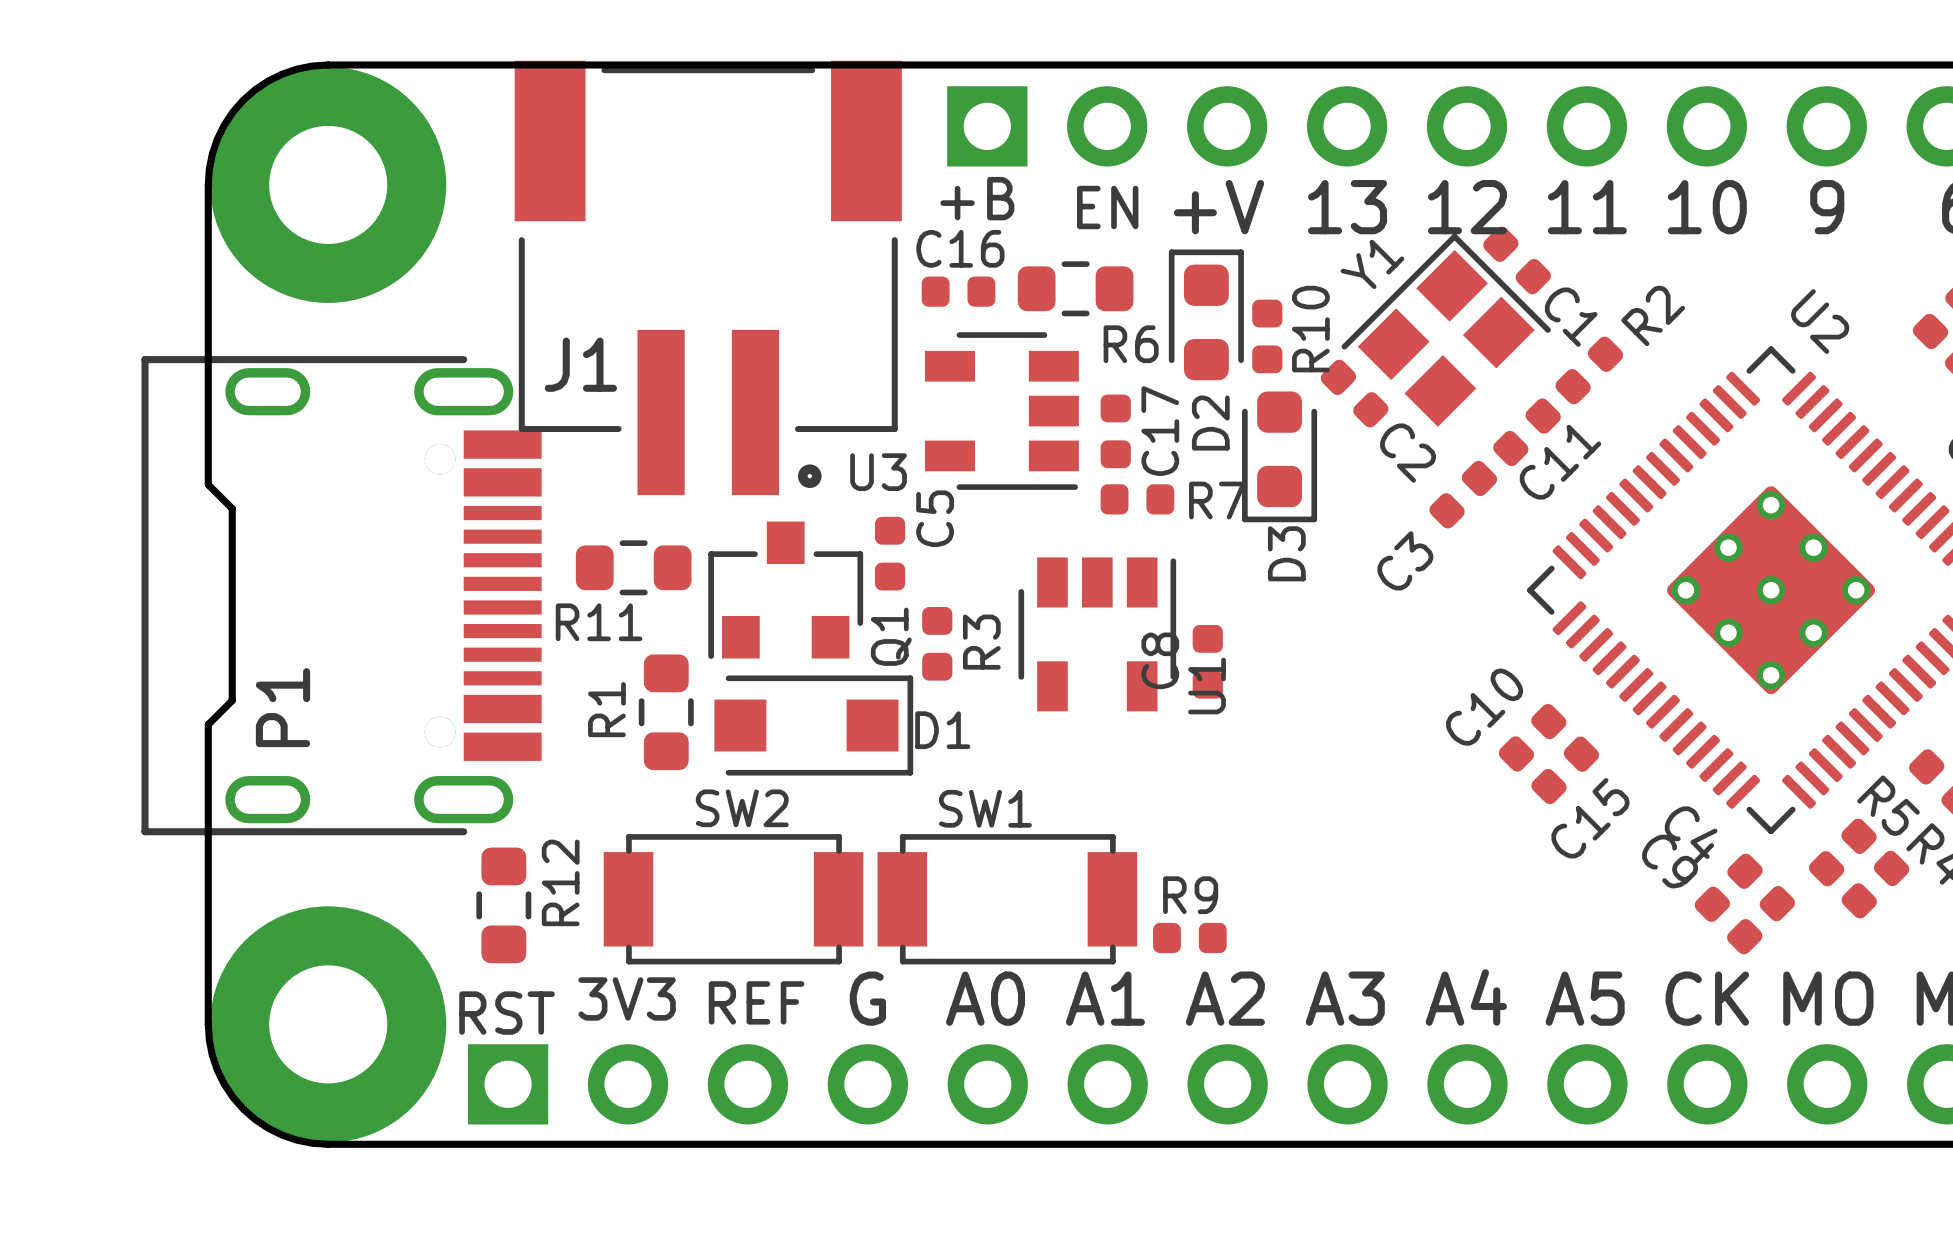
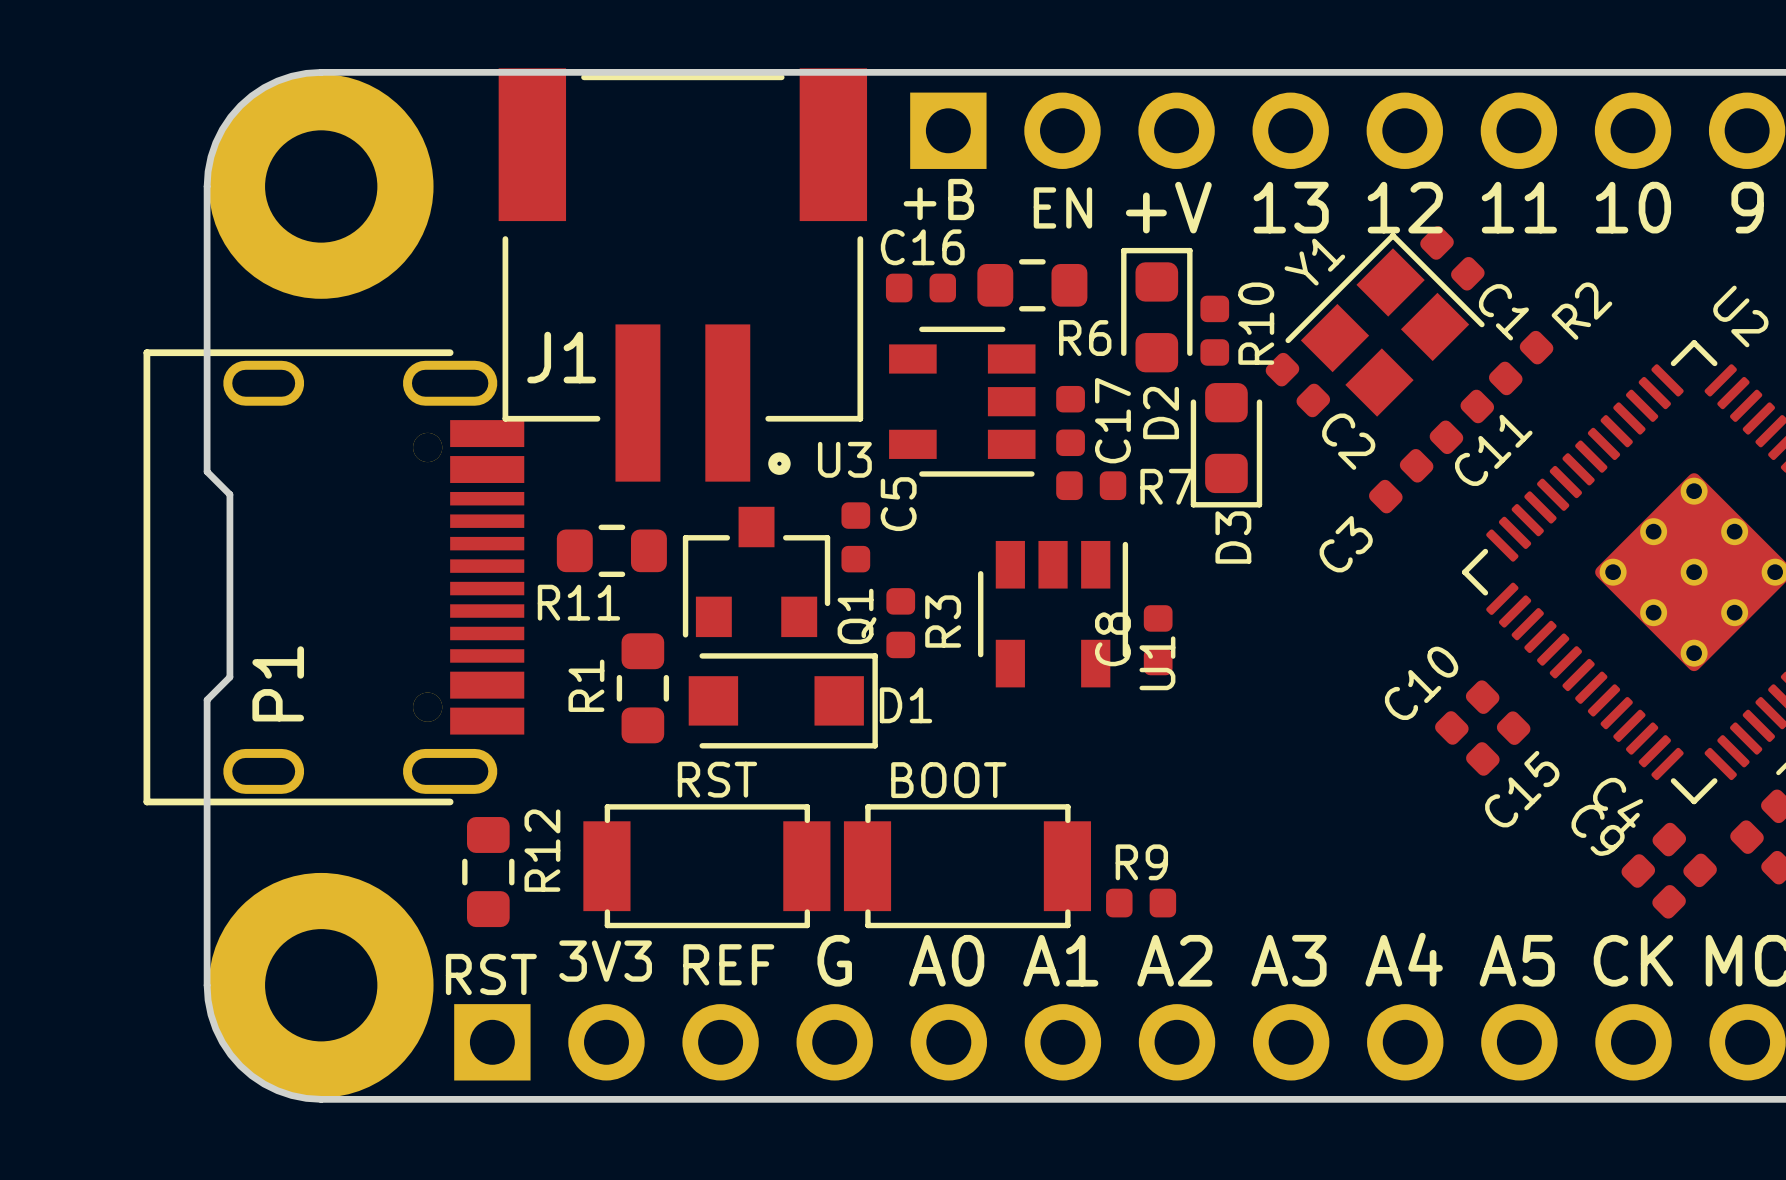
SW2 name: SW2 (742, 808) -> RST (717, 779)
SW1 name: SW1 (985, 808) -> BOOT (948, 780)

